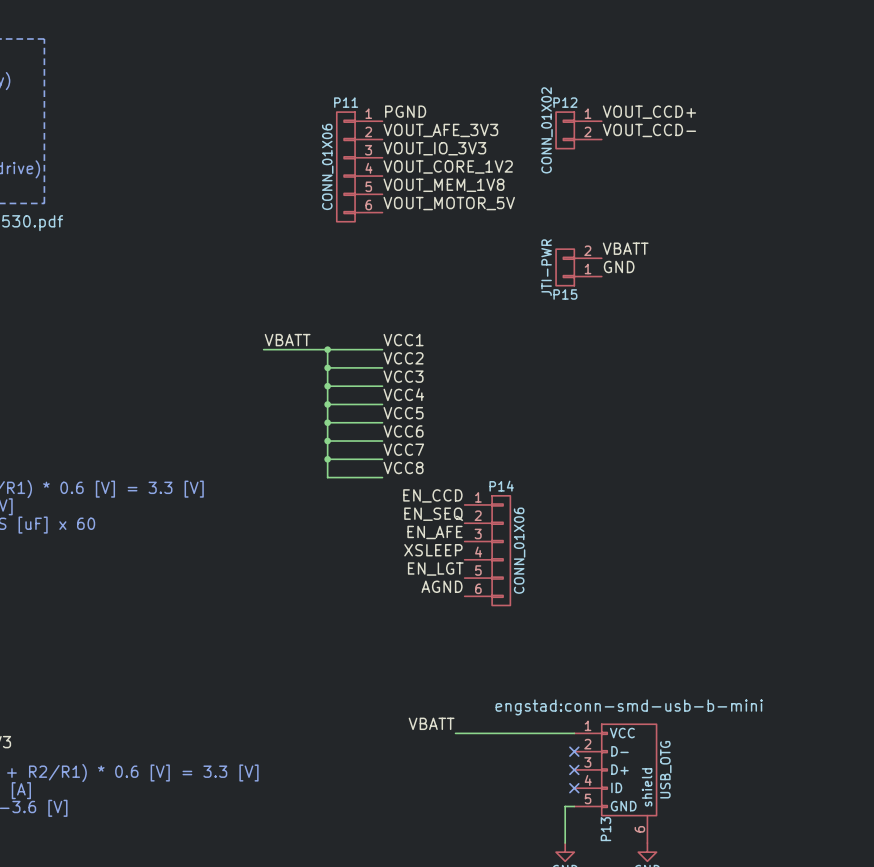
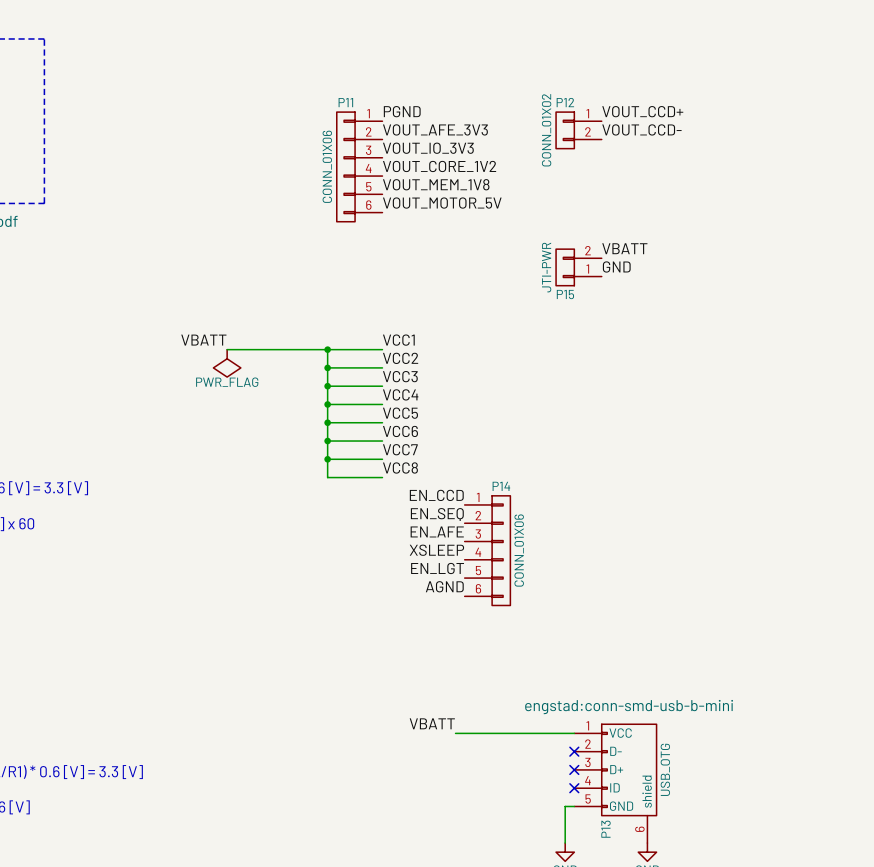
label position: VBATT (287, 340) -> VBATT (203, 340)
wire: none -> (227, 349) (263, 349)
power symbol: none -> PWR_FLAG (227, 363)

